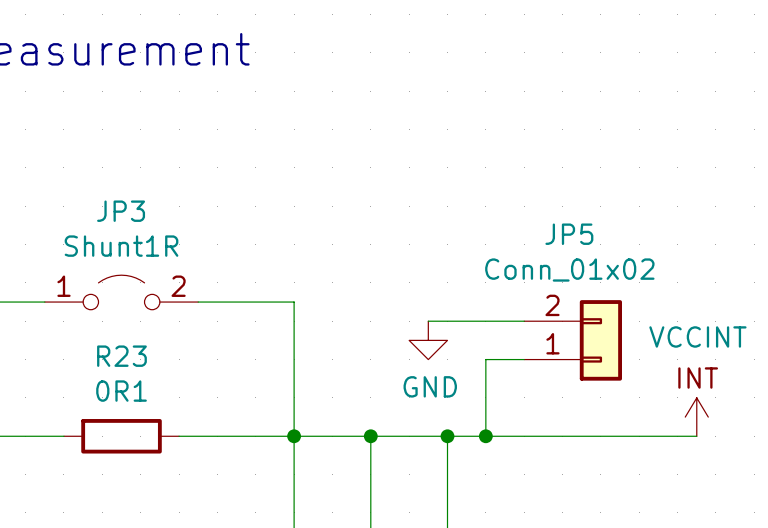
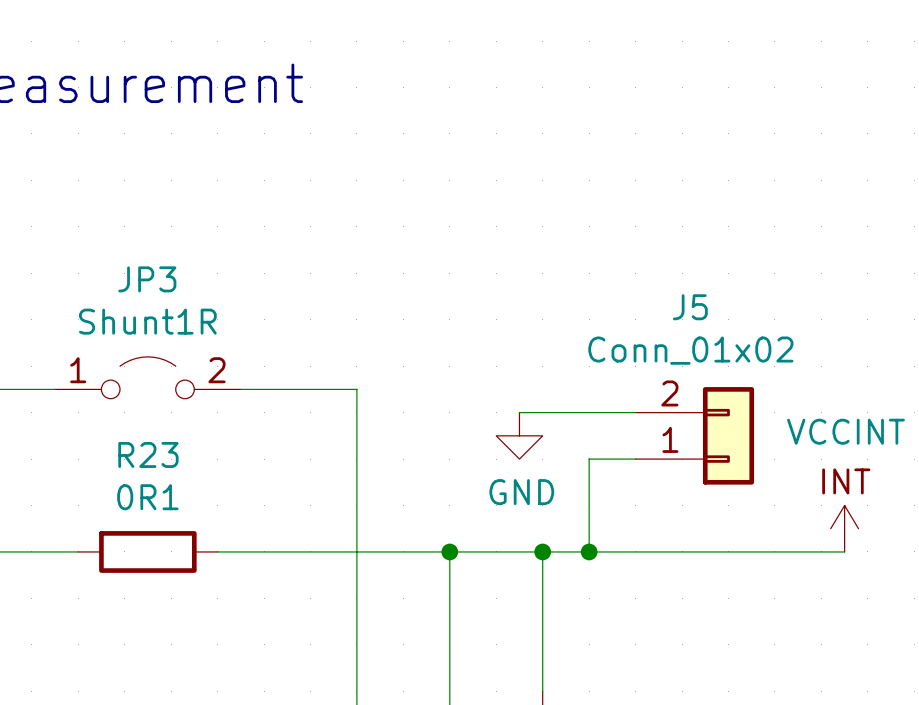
JP5 name: JP5 (569, 234) -> J5 (690, 307)
junction: (294, 436) -> none

